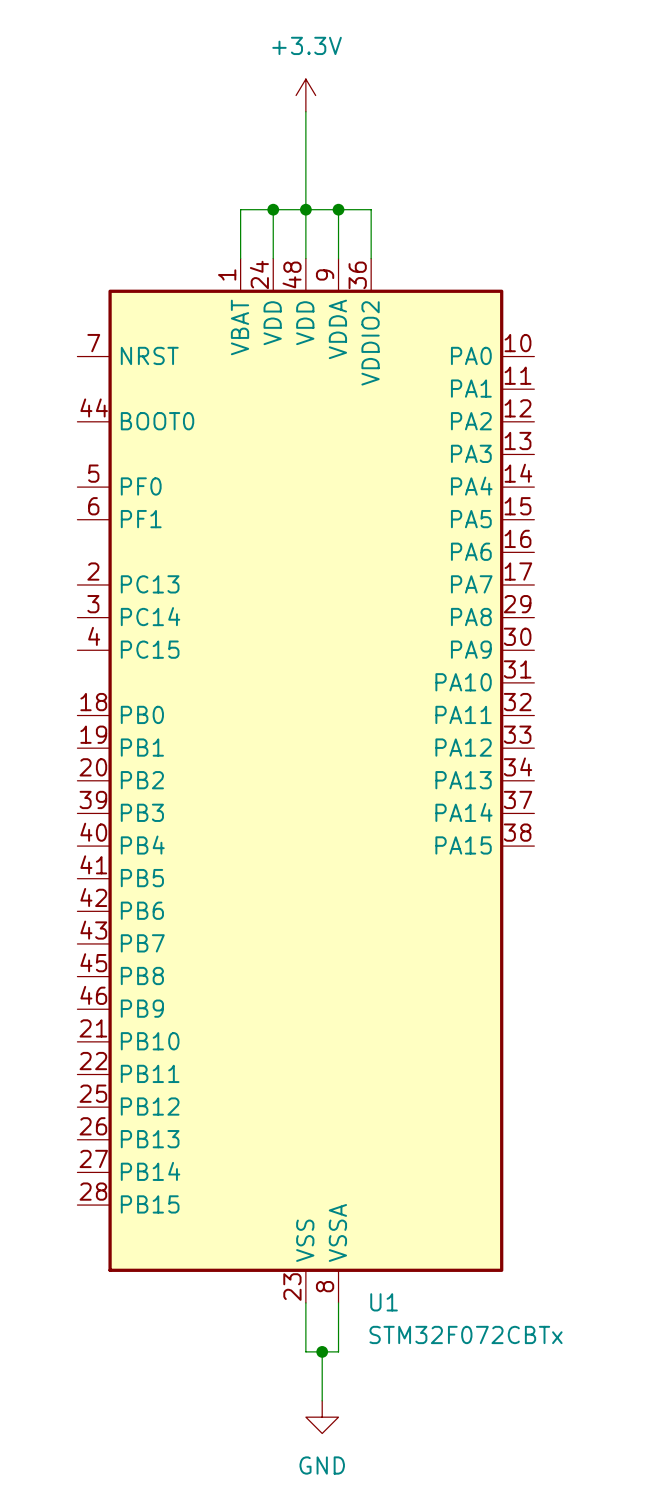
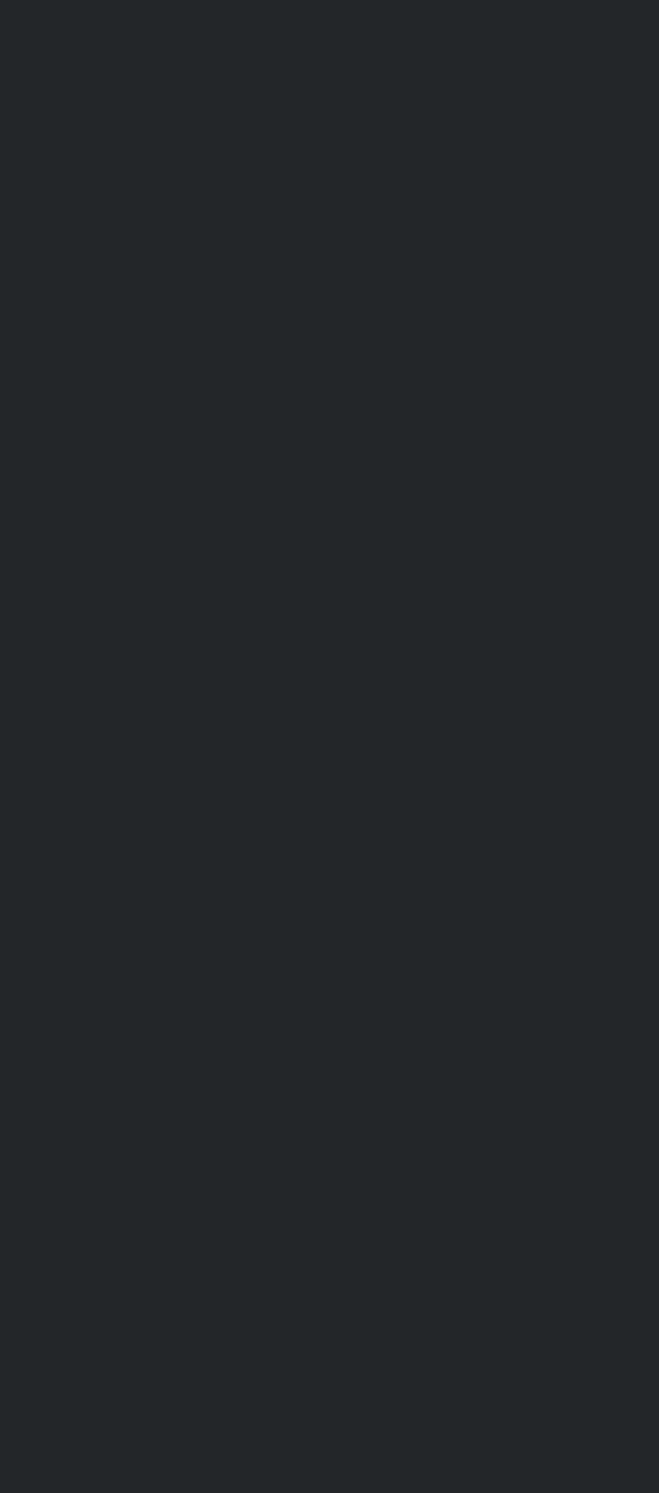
power symbol: +3.3V (305, 95) -> none
wire: (305, 111) (305, 258) -> none
wire: (273, 209) (273, 258) -> none
junction: (273, 209) -> none
junction: (305, 209) -> none
wire: (338, 209) (338, 258) -> none
junction: (338, 209) -> none
wire: (240, 258) (240, 209) (371, 209) (371, 258) -> none
U1: STM32F072CBTx (305, 780) -> none
wire: (305, 1302) (305, 1351) (338, 1351) (338, 1302) -> none
wire: (322, 1351) (322, 1400) -> none
junction: (322, 1351) -> none
power symbol: GND (322, 1417) -> none

